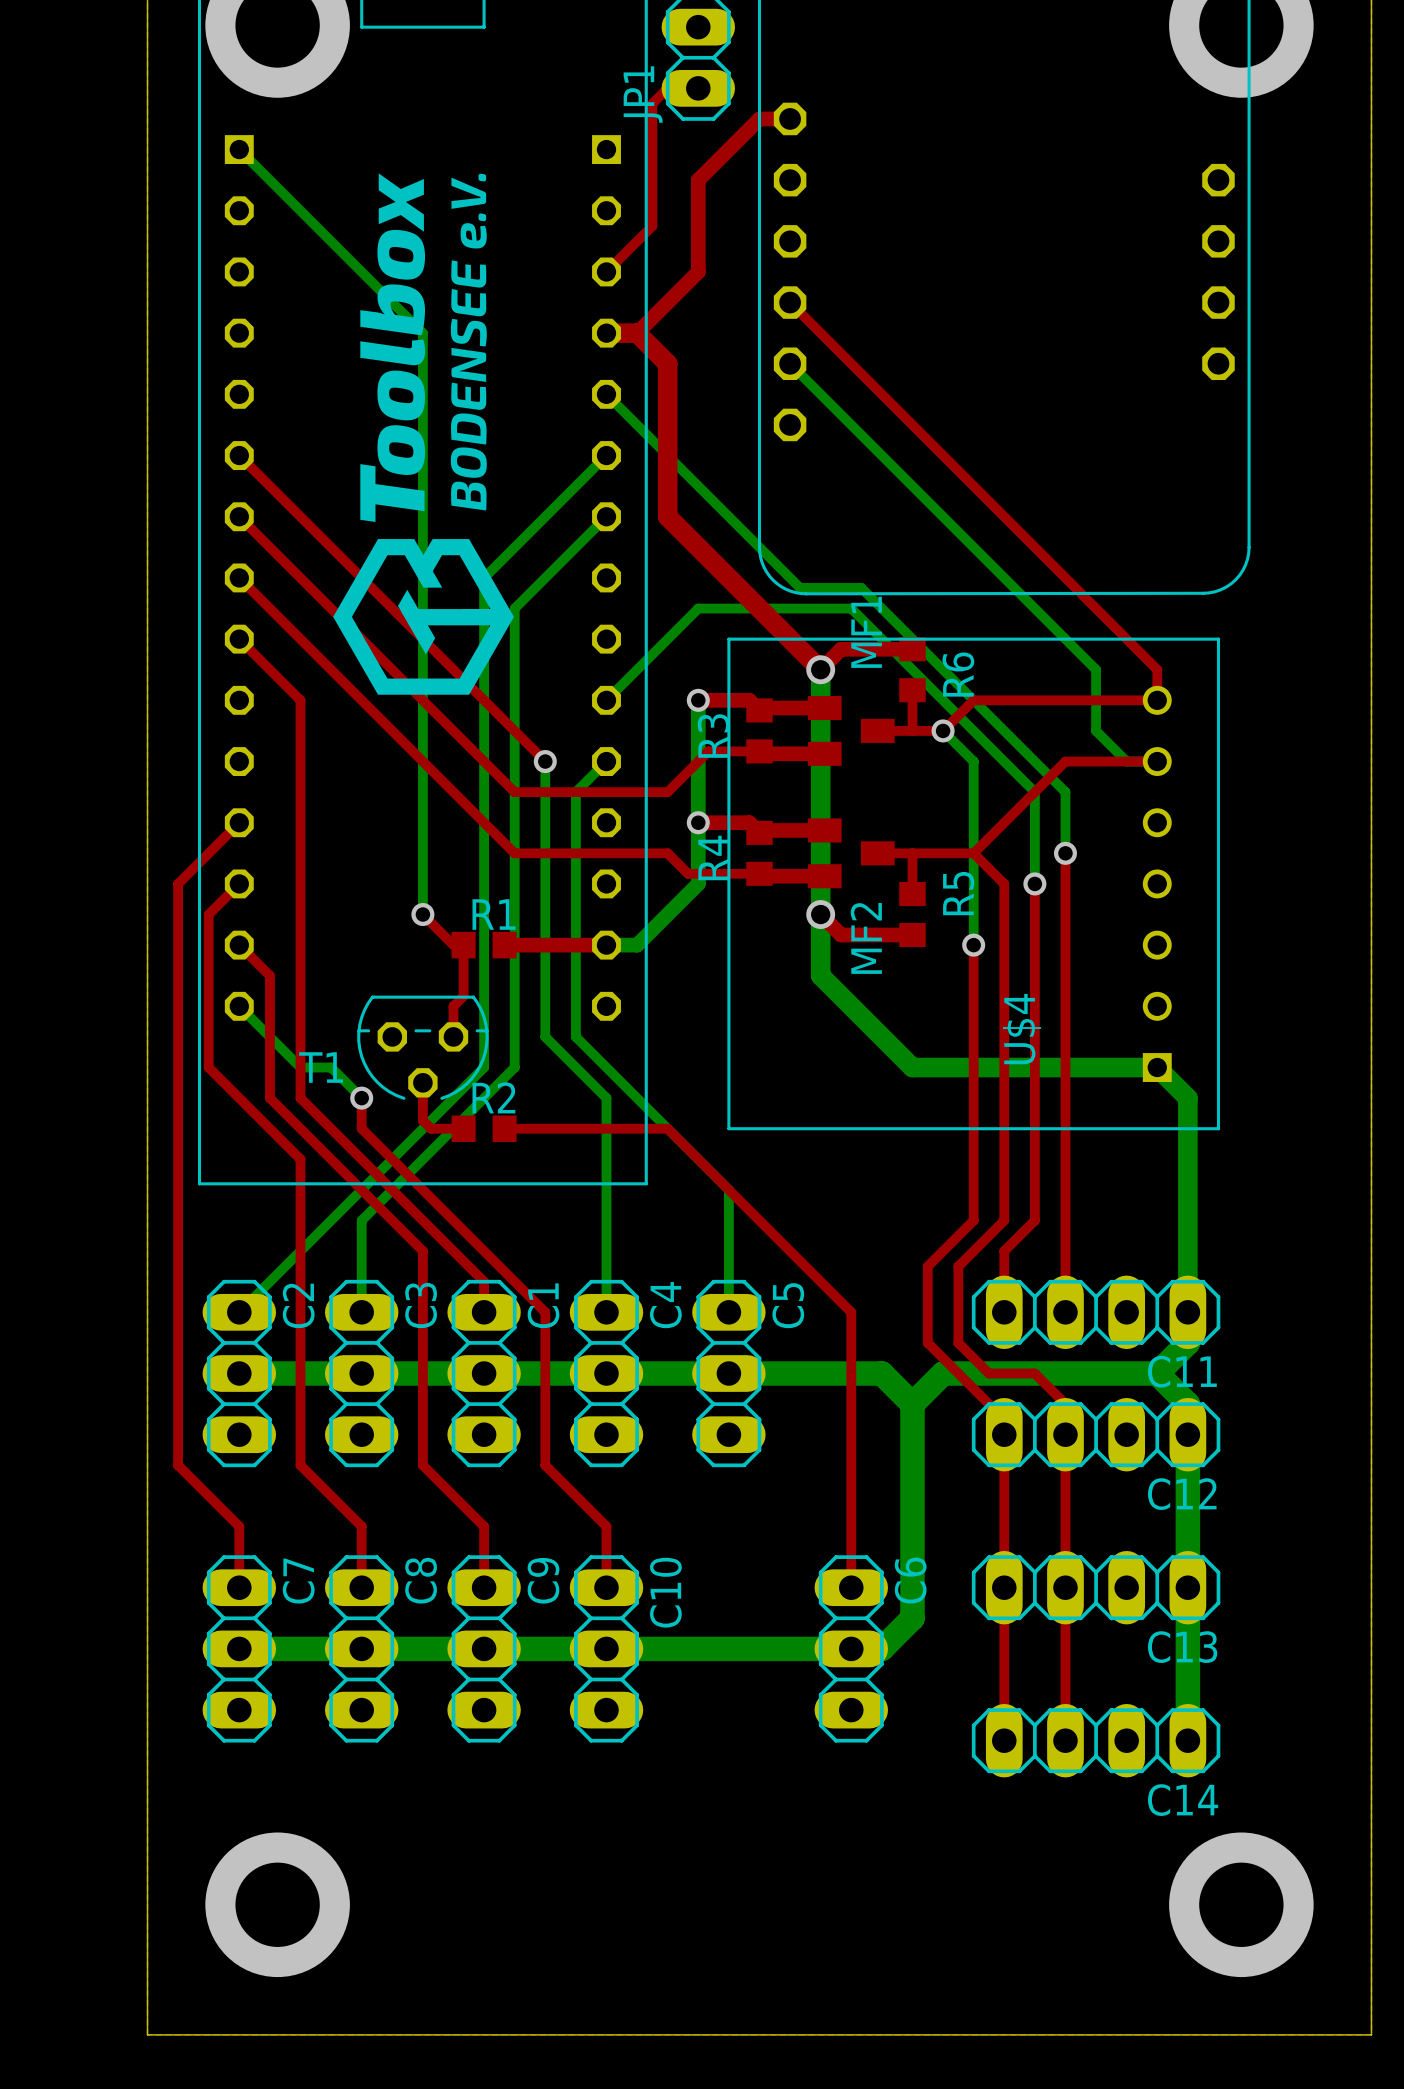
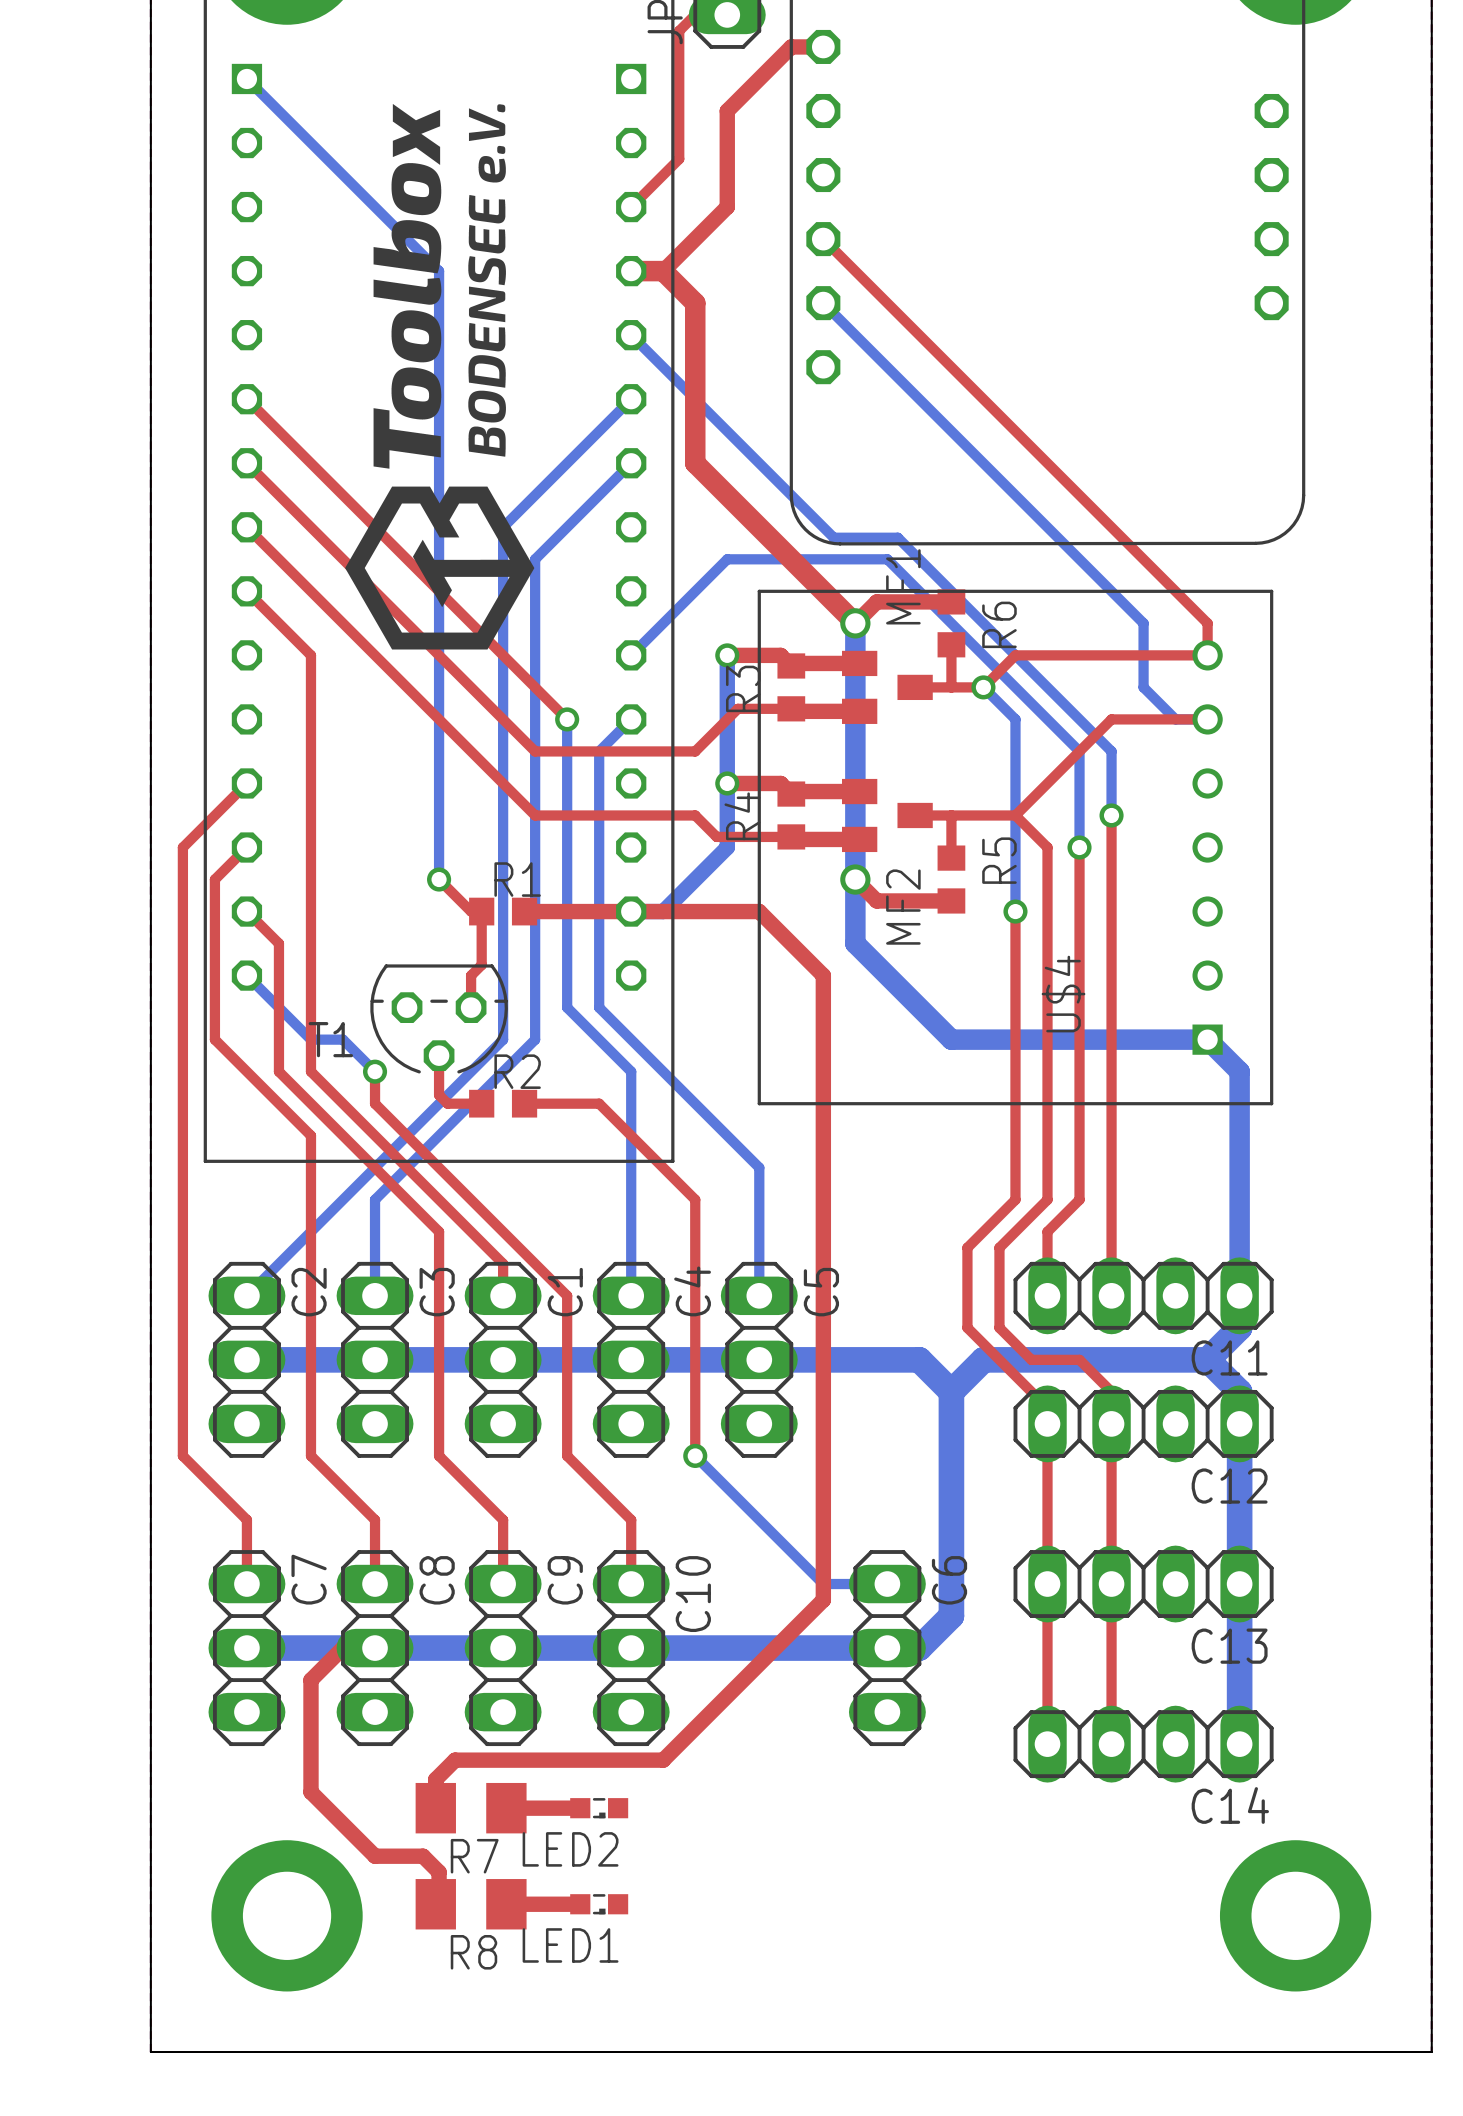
top track: none -> (631, 911) (759, 911) (823, 975) (823, 1600) (663, 1760) (455, 1760) (435, 1779) (435, 1808)
top track: (575, 1128) (667, 1128) (851, 1312) (851, 1587) -> (599, 1103) (695, 1199) (695, 1455)
bottom track: none -> (695, 1455) (823, 1584) (887, 1584)
via: none -> (695, 1455)
top track: none -> (375, 1648) (343, 1648) (310, 1680) (310, 1792) (375, 1856) (423, 1856) (439, 1872) (439, 1900) (435, 1904)
R7: none -> (471, 1808)
top track: none -> (506, 1808) (580, 1808)
LED2: none -> (599, 1808)
R8: none -> (471, 1904)
top track: none -> (506, 1904) (580, 1904)
LED1: none -> (599, 1904)

